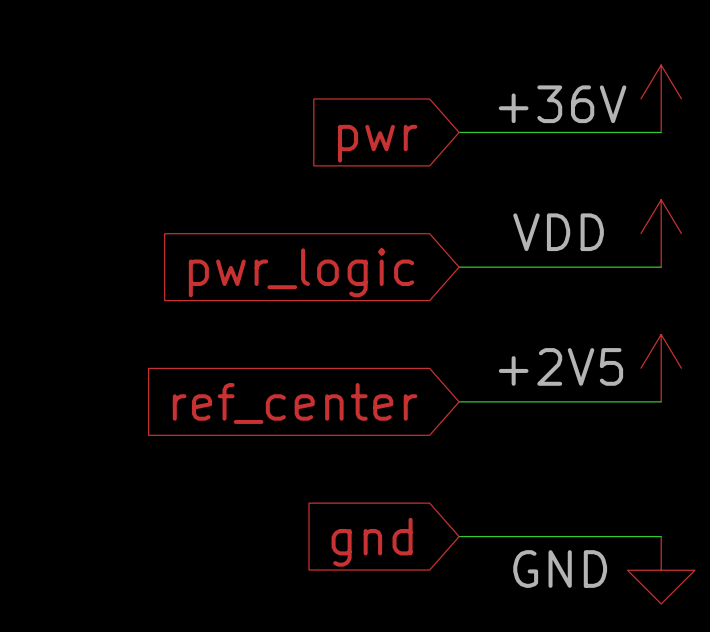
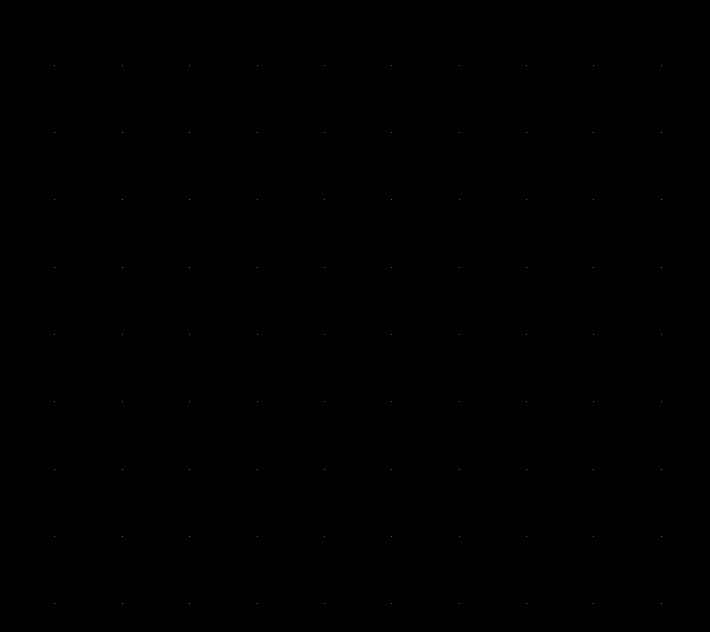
power symbol: +36V (661, 98) -> none
wire: (459, 132) (661, 132) -> none
global label: pwr (377, 143) -> none
power symbol: VDD (661, 233) -> none
wire: (459, 267) (661, 267) -> none
global label: pwr_logic (301, 272) -> none
power symbol: +2V5 (661, 368) -> none
wire: (459, 401) (661, 401) -> none
global label: ref_center (295, 403) -> none
wire: (459, 536) (661, 536) -> none
global label: gnd (372, 542) -> none
power symbol: GND (661, 570) -> none

